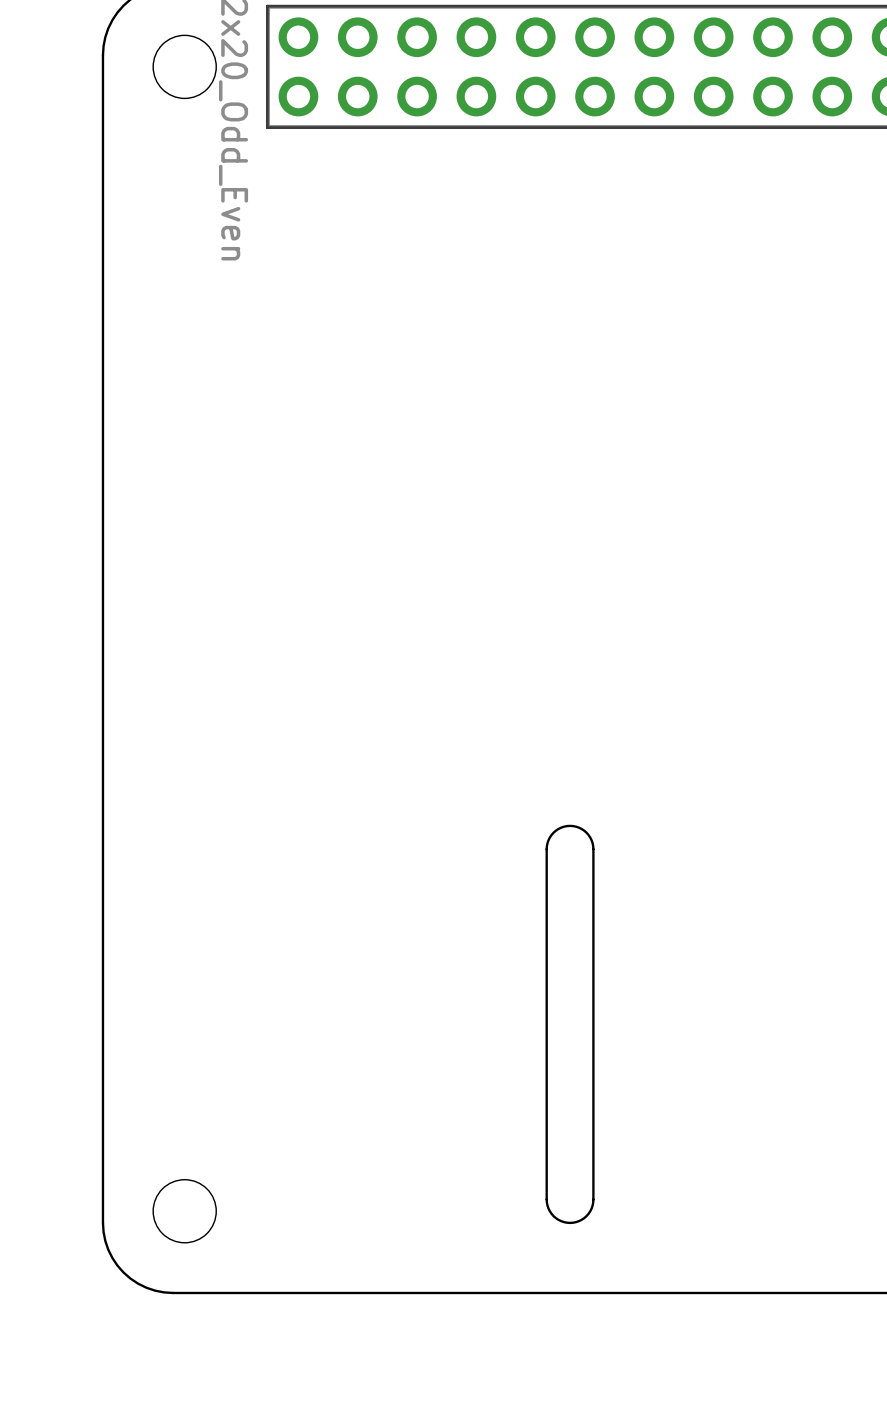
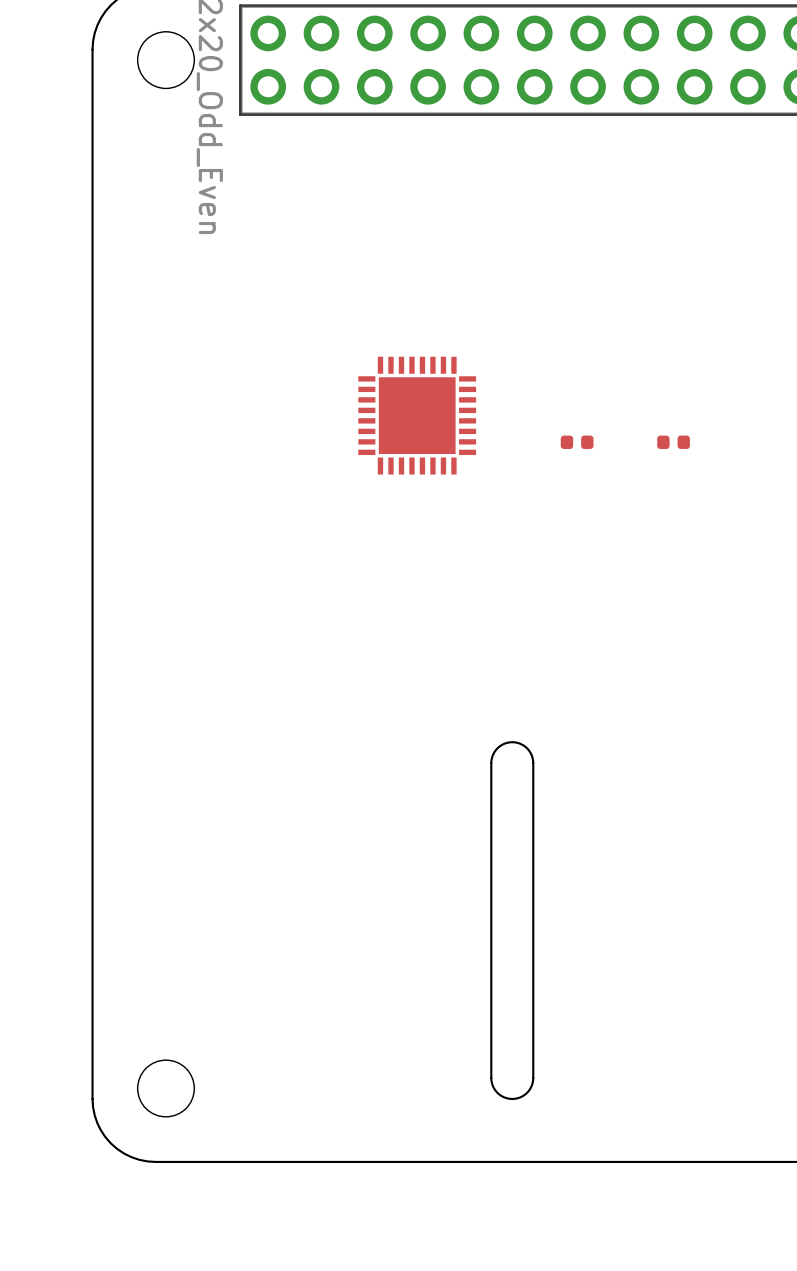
part: none -> (417, 415)
part: none -> (577, 442)
part: none -> (673, 442)

